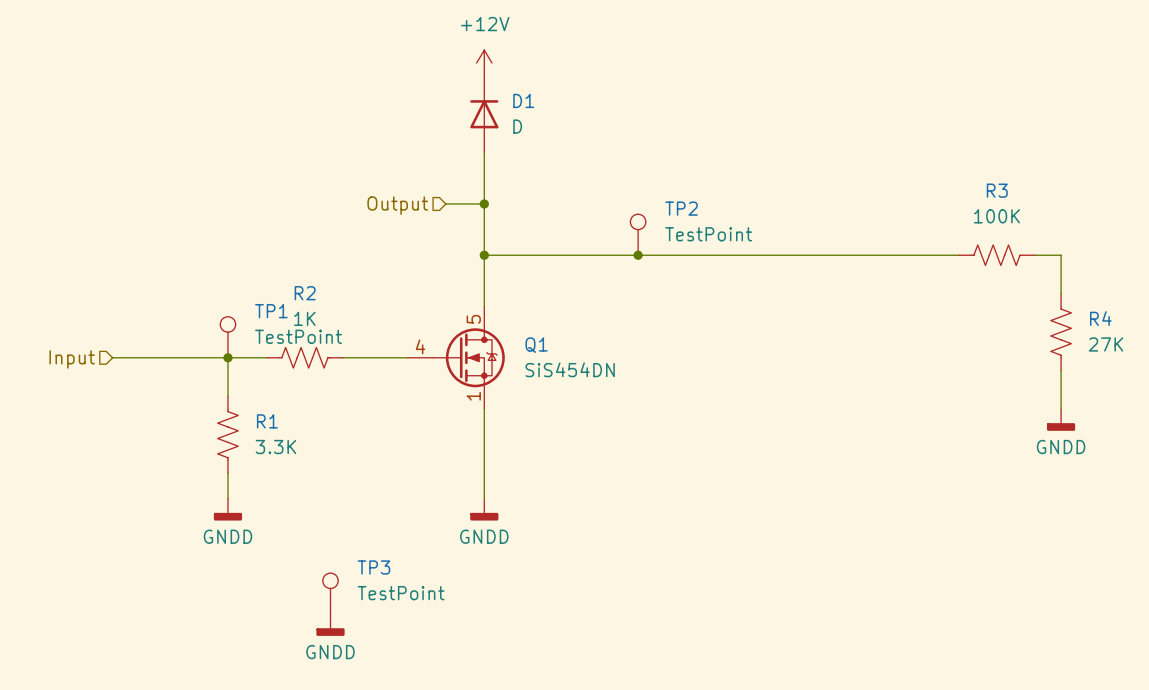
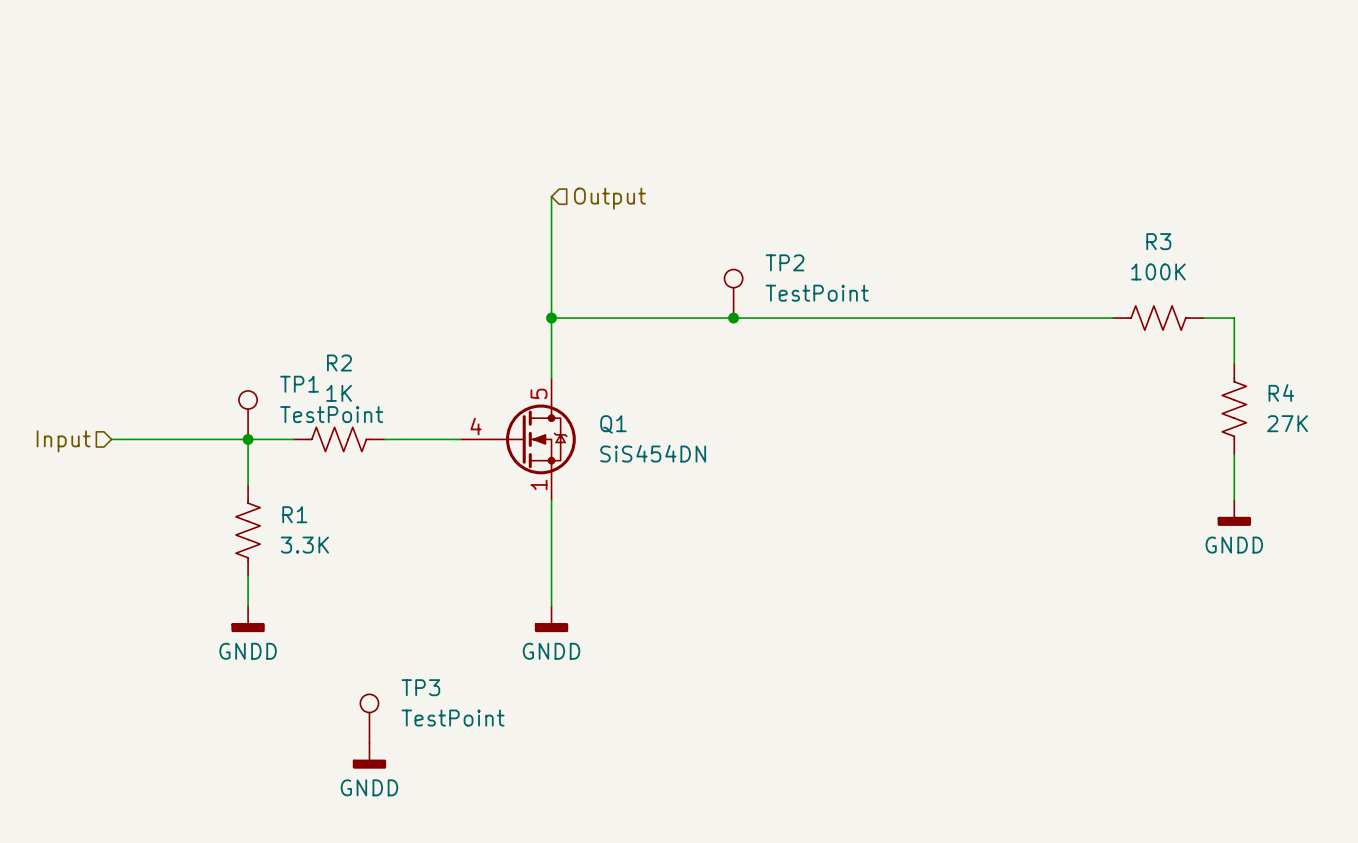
power symbol: +12V (484, 62) -> none
D1: D (484, 114) -> none
wire: (445, 203) (484, 203) -> none
junction: (484, 203) -> none
hierarchical label rotation: 0° (397, 205) -> 180° (609, 198)
hierarchical label position: Output (397, 205) -> Output (609, 198)

